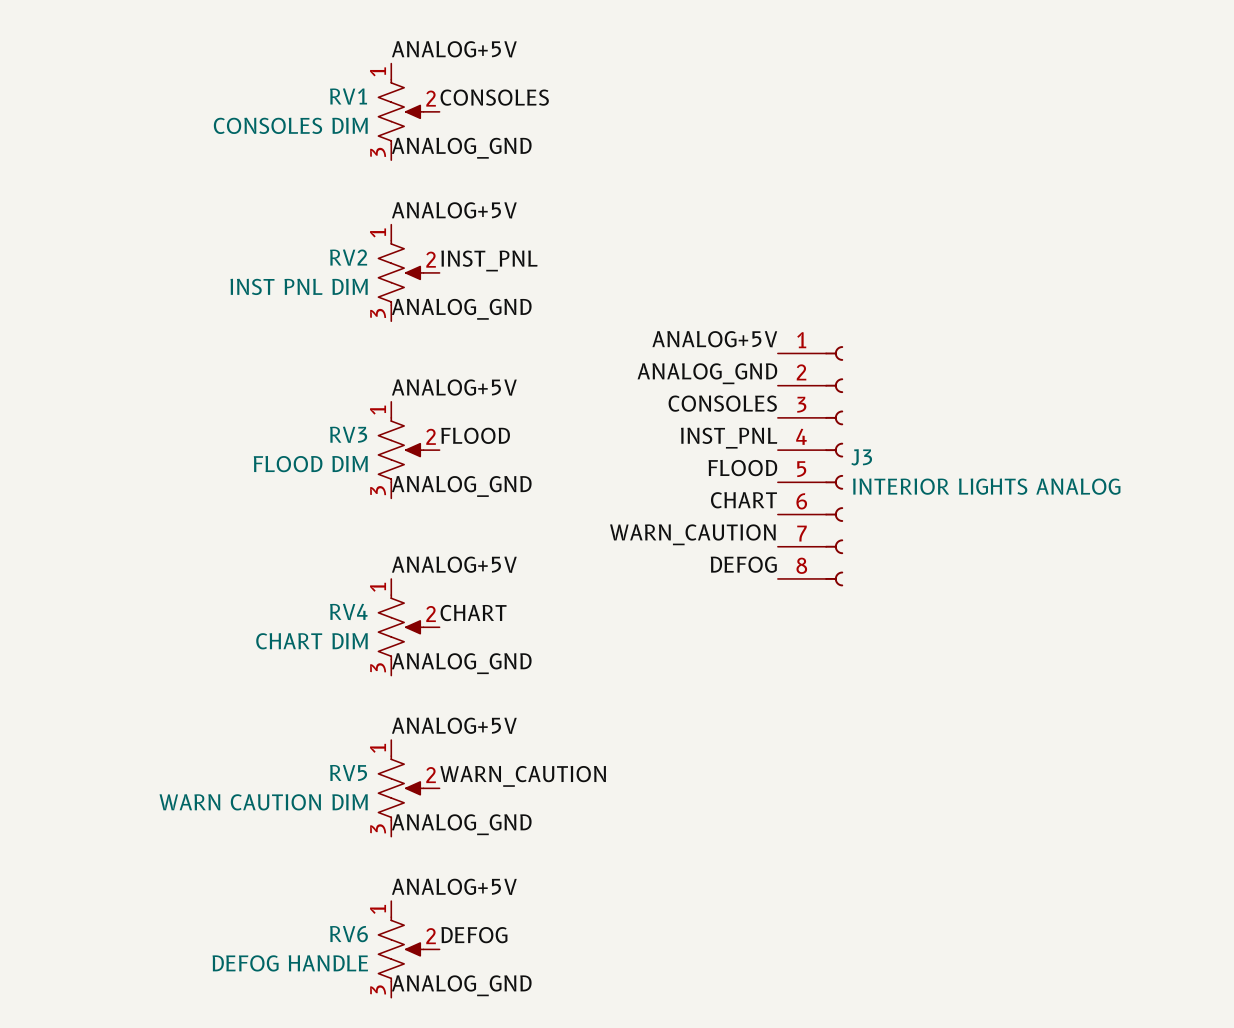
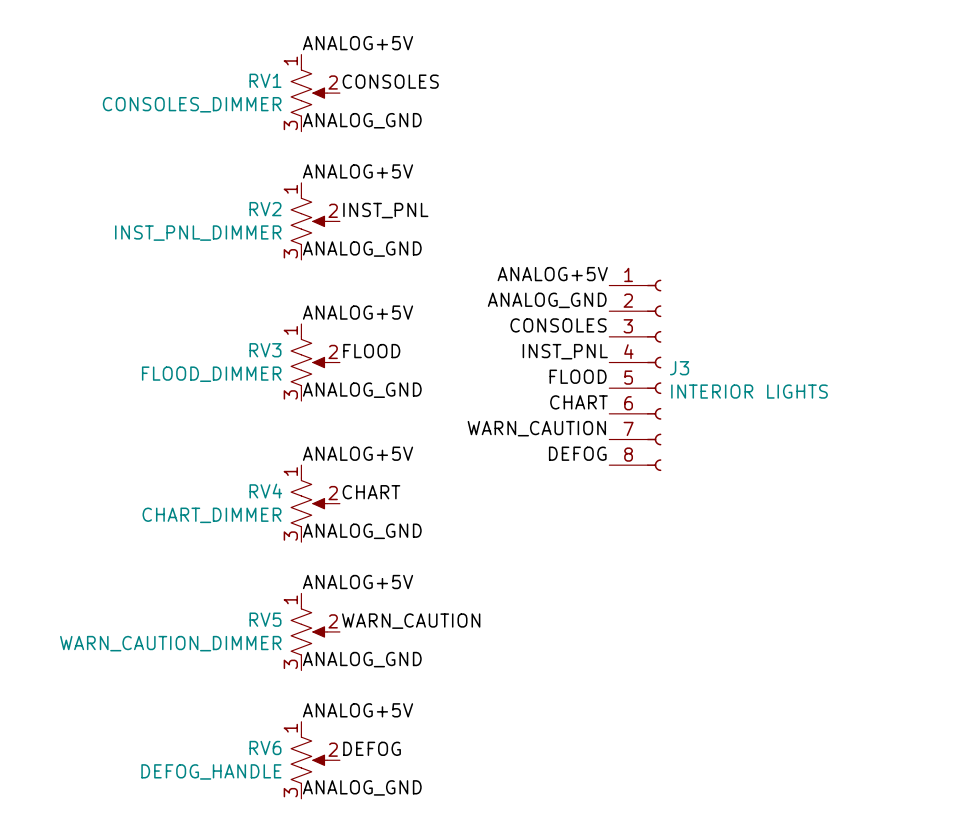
RV1 value: CONSOLES DIM (290, 125) -> CONSOLES_DIMMER (192, 104)
RV2 value: INST PNL DIM (299, 286) -> INST_PNL_DIMMER (198, 233)
RV3 value: FLOOD DIM (310, 464) -> FLOOD_DIMMER (211, 374)
J3 value: INTERIOR LIGHTS ANALOG (986, 486) -> INTERIOR LIGHTS (749, 391)
RV4 value: CHART DIM (311, 641) -> CHART_DIMMER (212, 515)
RV5 value: WARN CAUTION DIM (263, 802) -> WARN_CAUTION_DIMMER (170, 643)
RV6 value: DEFOG HANDLE (290, 963) -> DEFOG_HANDLE (211, 771)

